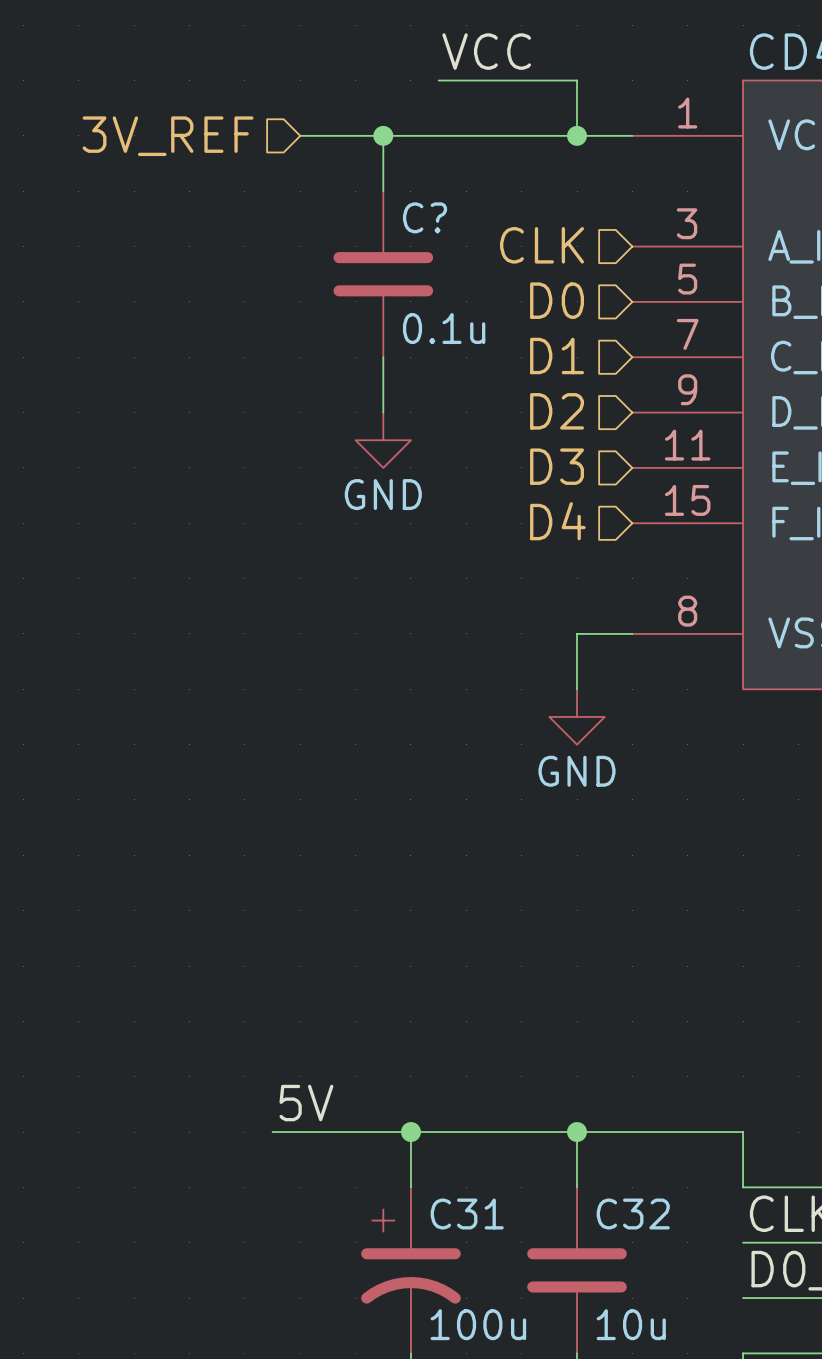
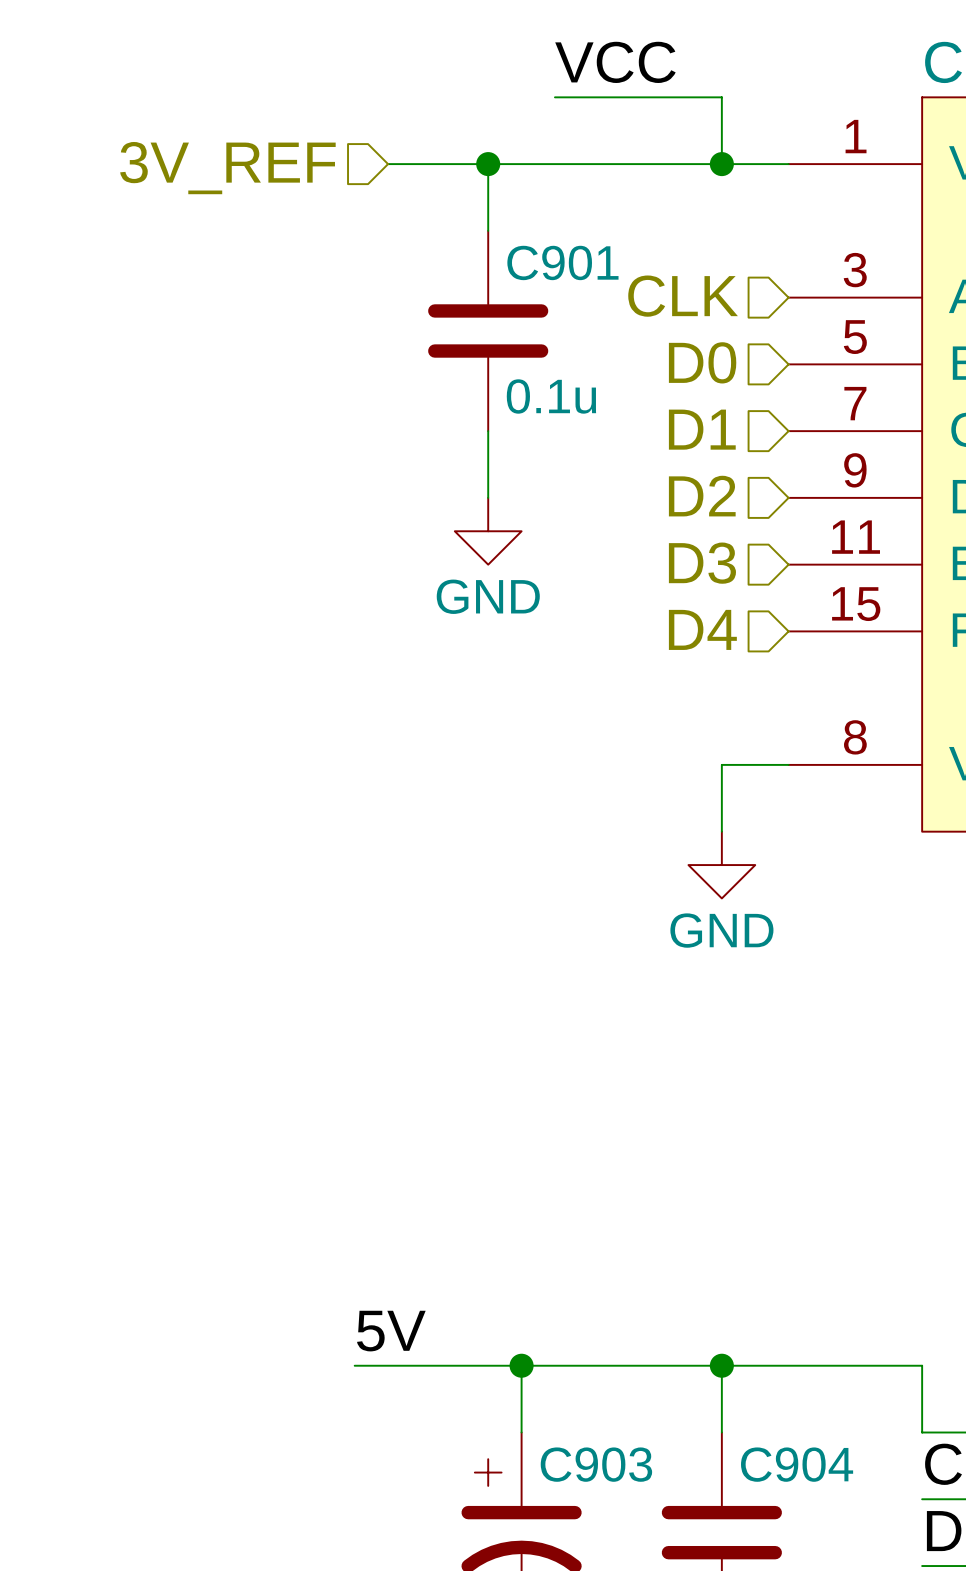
C? name: C? (425, 217) -> C901 (562, 262)
C31 name: C31 (467, 1214) -> C903 (596, 1464)
C32 name: C32 (633, 1214) -> C904 (797, 1464)

